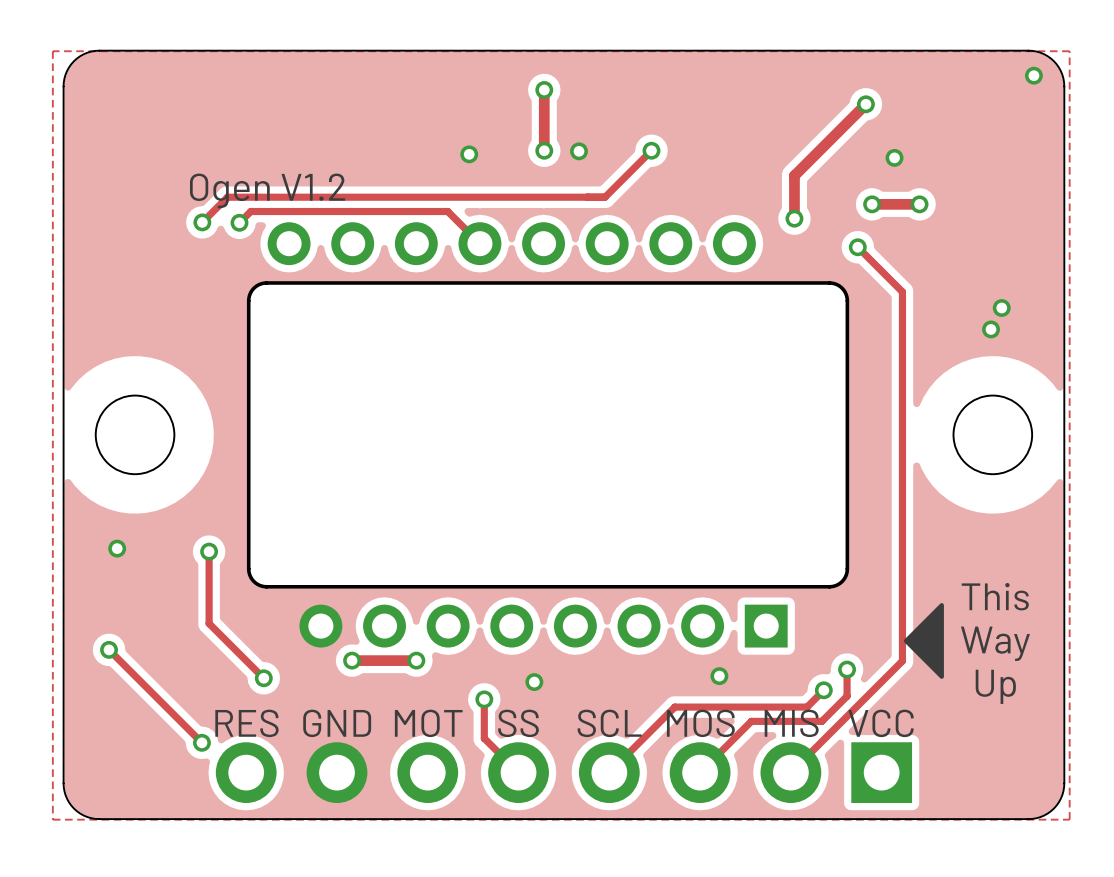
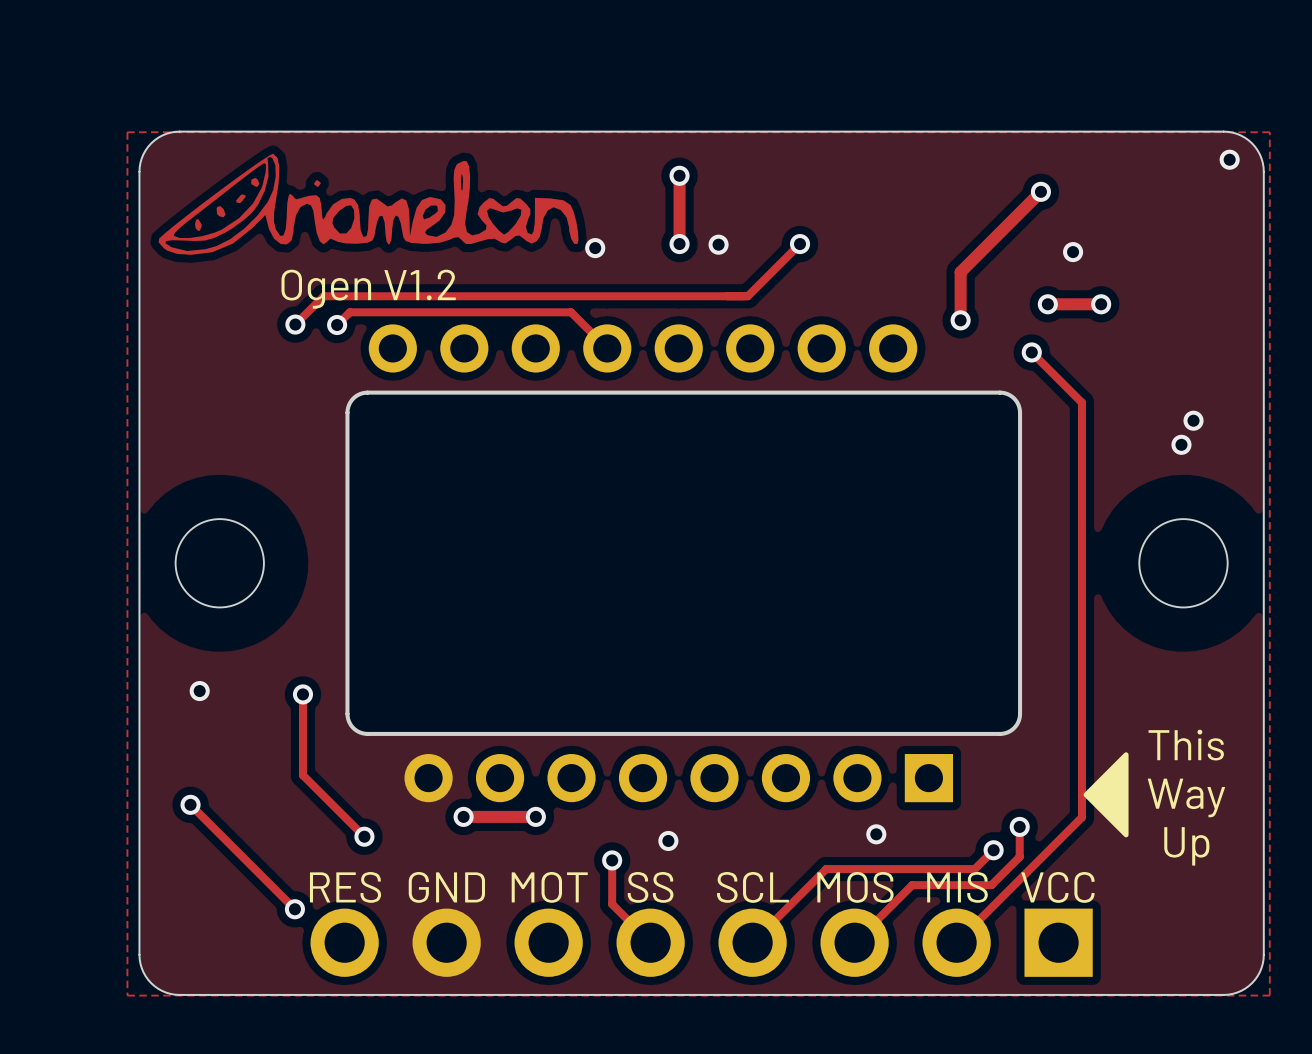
drawing: none -> [158, 153, 579, 255]

